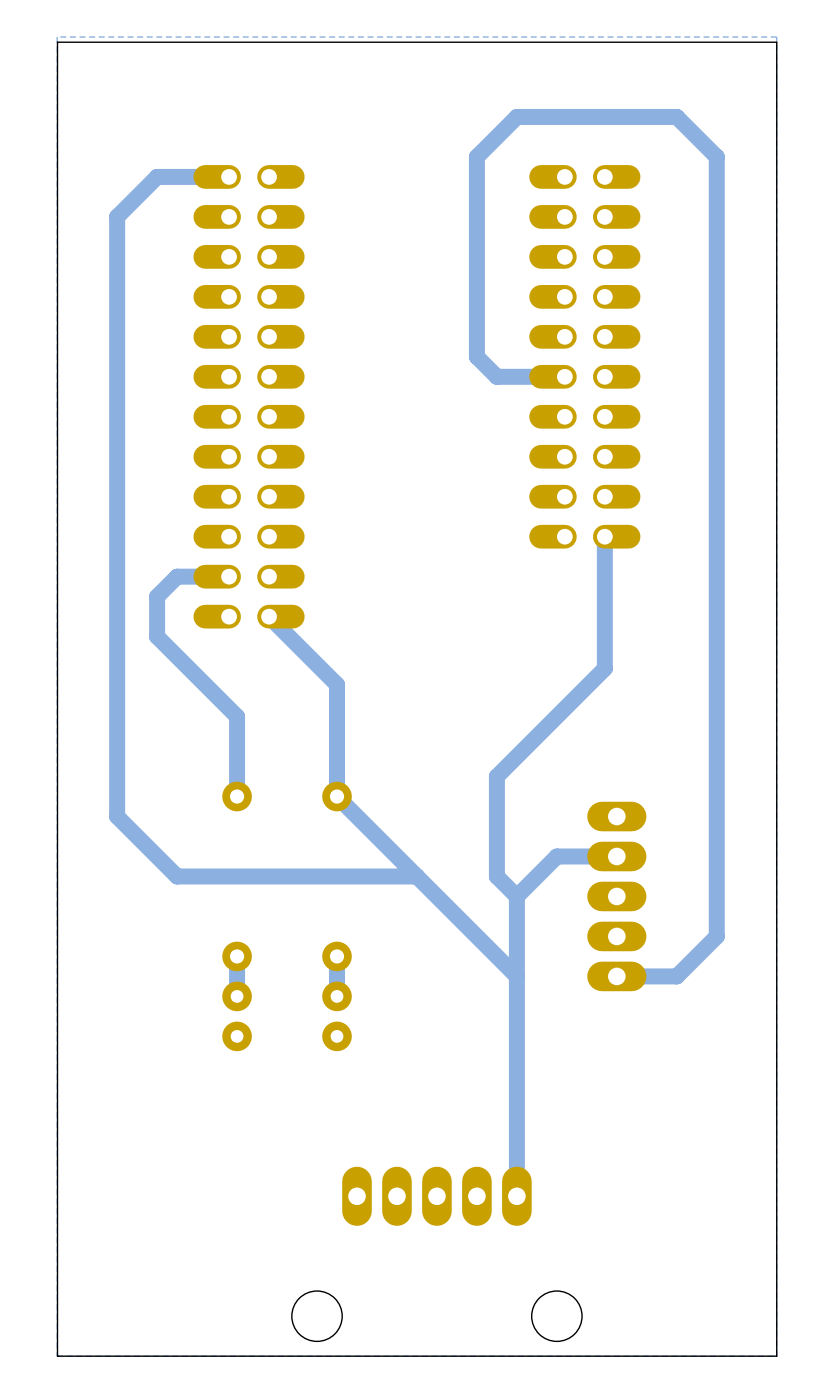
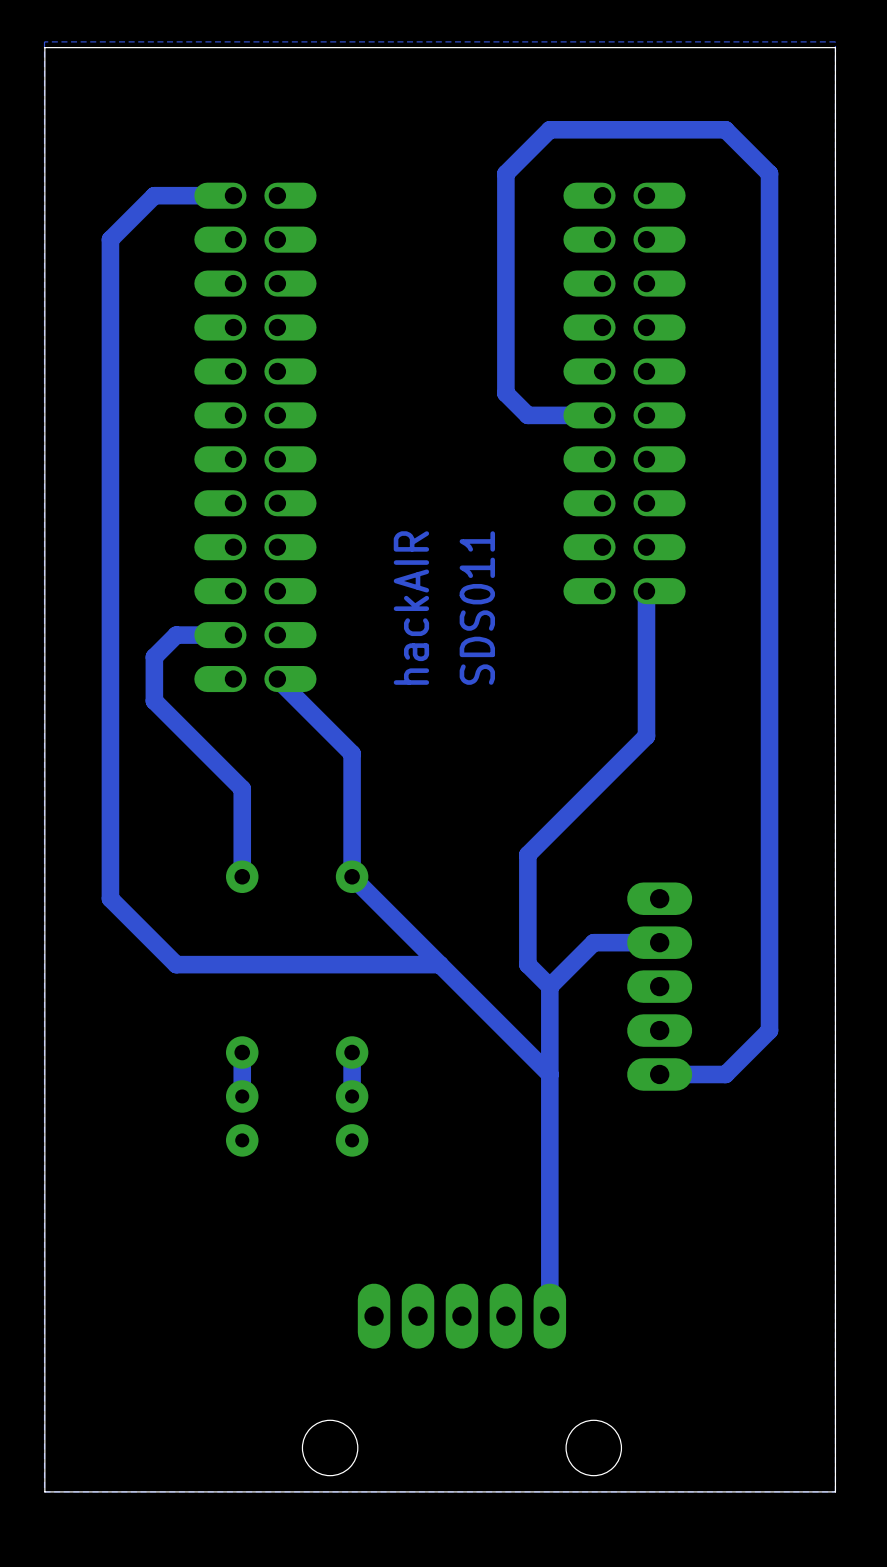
text: none -> hackAIR (411, 608)
text: none -> SDS011 (477, 608)

